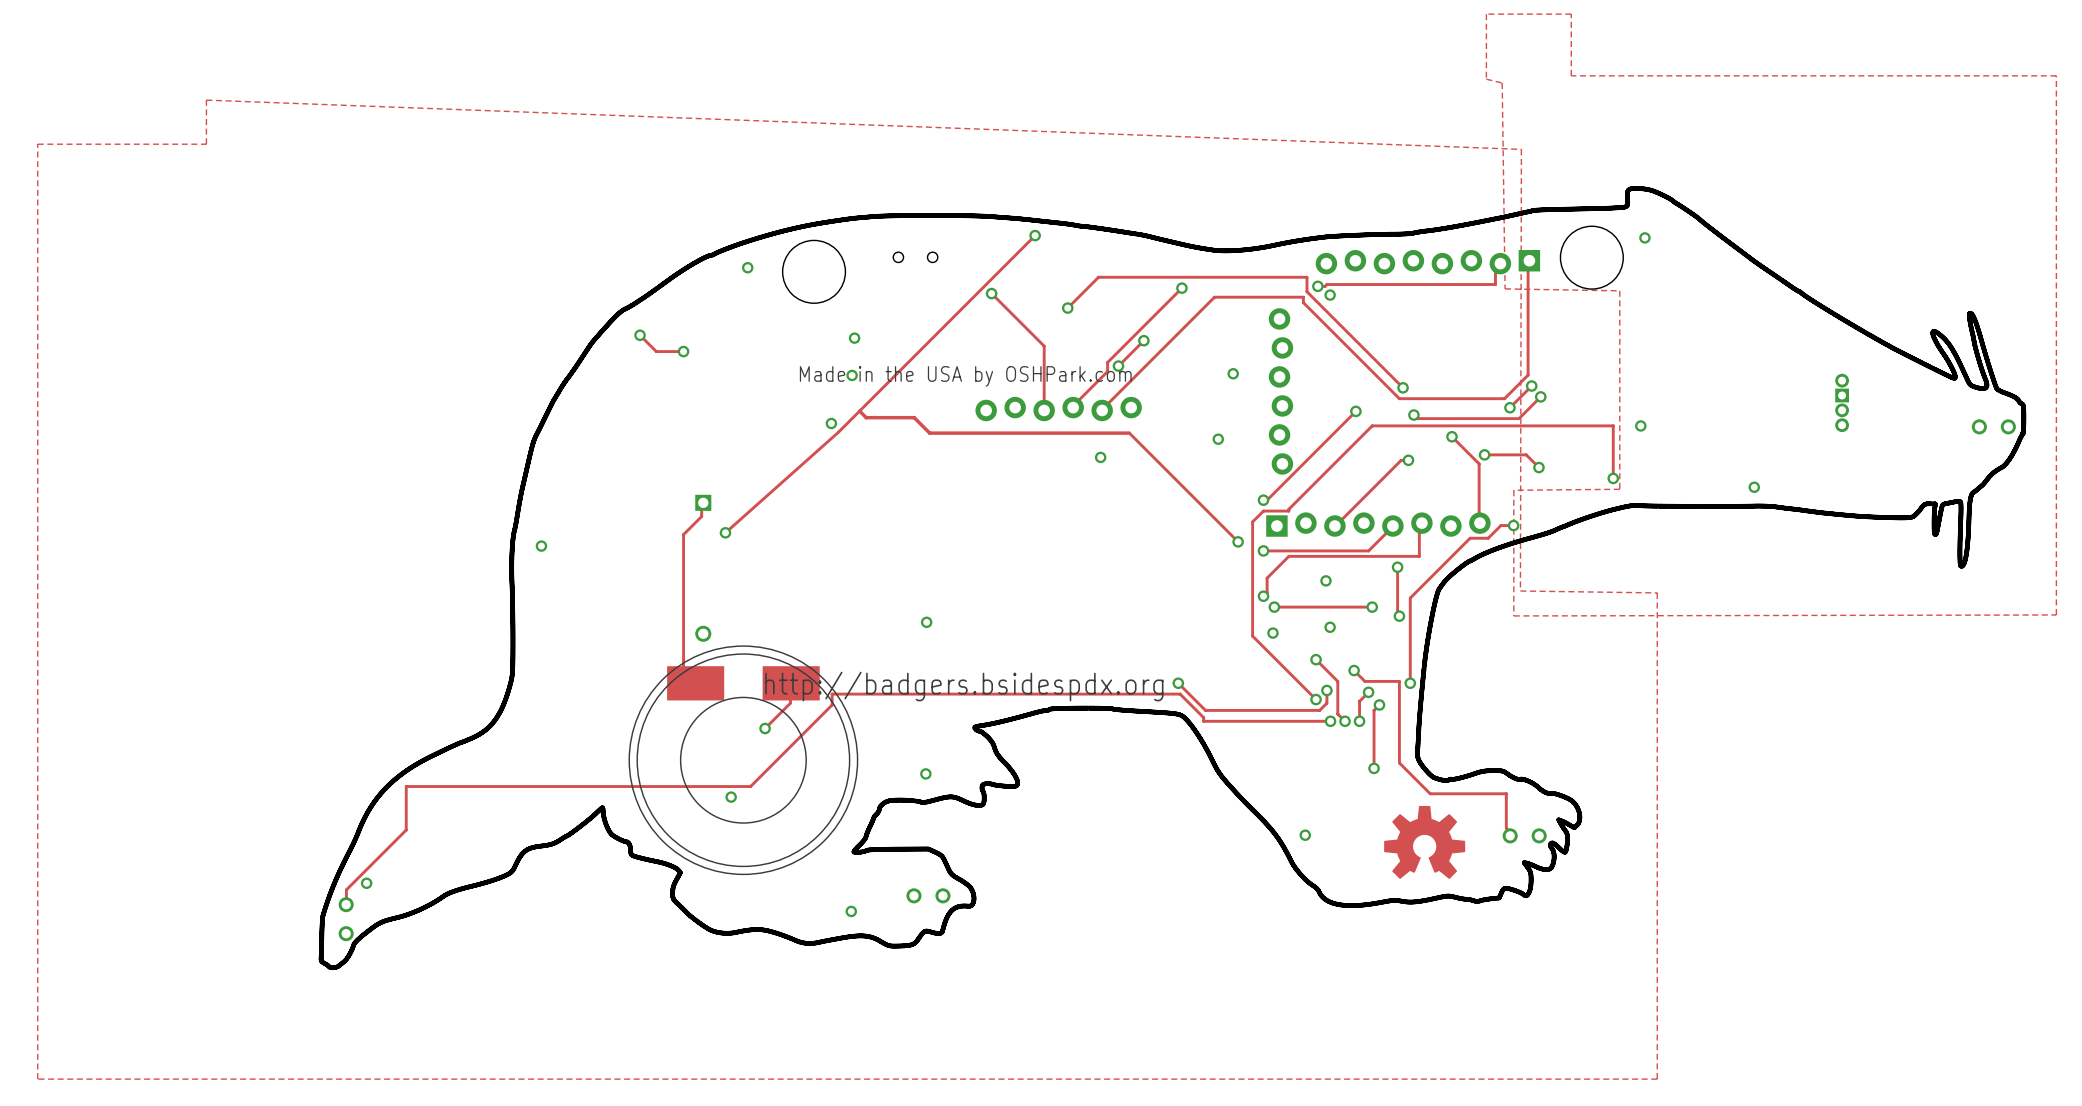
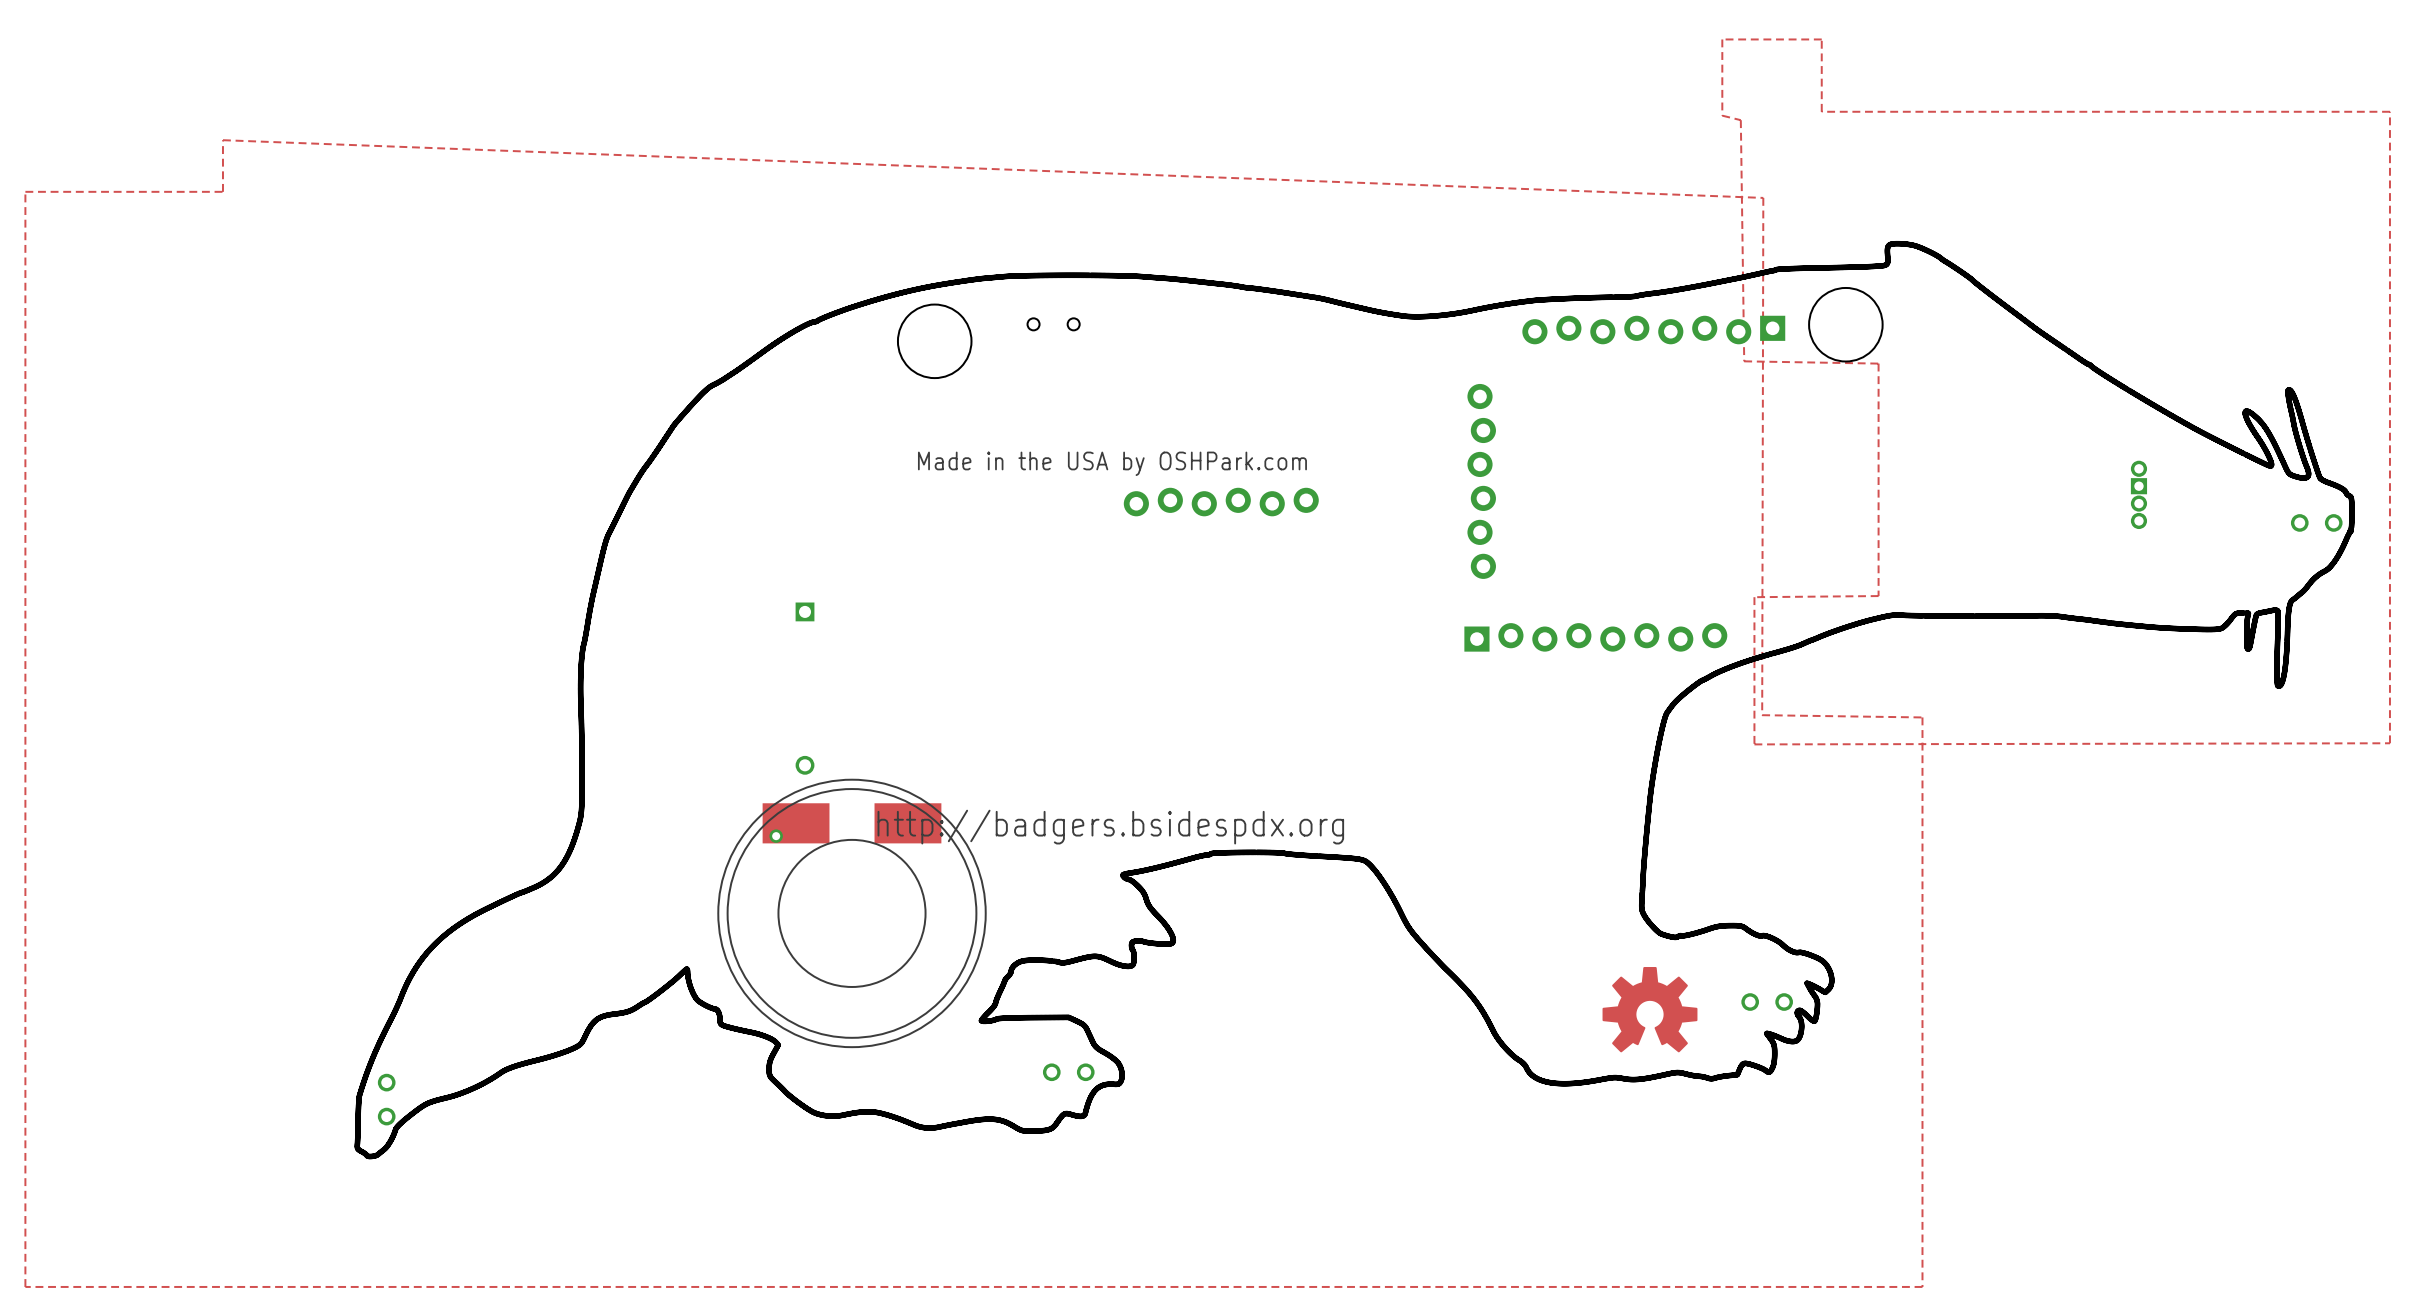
track: (1035, 235) (838, 432) (725, 532) -> none
via: (1035, 235) -> none
via: (1644, 237) -> none
track: (1529, 260) (1528, 375) (1504, 398) (1399, 398) (1303, 302) (1303, 297) (1214, 297) (1102, 410) -> none
track: (1500, 263) (1499, 270) (1495, 273) (1495, 284) (1326, 284) (1317, 286) -> none
via: (747, 267) -> none
via: (1317, 286) -> none
track: (1181, 288) (1107, 362) (1107, 371) (1073, 407) -> none
via: (1181, 288) -> none
track: (991, 293) (1044, 346) (1044, 410) -> none
via: (991, 293) -> none
via: (1330, 295) -> none
track: (1067, 308) (1098, 277) (1306, 277) (1306, 291) (1403, 387) -> none
via: (1067, 308) -> none
track: (640, 335) (656, 351) (683, 351) -> none
via: (640, 335) -> none
via: (854, 338) -> none
track: (1143, 340) (1118, 366) -> none
via: (1143, 340) -> none
via: (683, 351) -> none
via: (1118, 366) -> none
via: (1233, 373) -> none
via: (852, 375) -> none
track: (1531, 386) (1509, 407) -> none
via: (1531, 386) -> none
via: (1403, 387) -> none
track: (1540, 396) (1519, 418) (1413, 418) (1413, 415) -> none
via: (1540, 396) -> none
via: (1509, 407) -> none
track: (859, 411) (866, 417) (914, 417) (929, 433) (1129, 433) (1238, 541) -> none
track: (1355, 411) (1267, 500) (1263, 500) -> none
via: (1355, 411) -> none
via: (1413, 415) -> none
via: (831, 423) -> none
via: (1640, 425) -> none
track: (1451, 436) (1479, 463) (1479, 523) -> none
via: (1451, 436) -> none
via: (1218, 439) -> none
track: (1484, 454) (1526, 454) (1538, 467) -> none
via: (1484, 454) -> none
via: (1100, 457) -> none
track: (1408, 460) (1401, 460) (1334, 526) -> none
via: (1408, 460) -> none
via: (1538, 467) -> none
track: (1613, 478) (1613, 425) (1372, 425) (1288, 511) (1263, 511) (1252, 521) (1252, 636) (1316, 699) -> none
via: (1613, 478) -> none
via: (1754, 487) -> none
via: (1263, 500) -> none
track: (703, 502) (701, 503) (701, 516) (683, 534) (683, 672) (695, 683) -> none
track: (1421, 523) (1419, 525) (1419, 556) (1288, 556) (1267, 578) (1267, 592) (1263, 596) -> none
track: (1513, 525) (1500, 525) (1488, 538) (1470, 538) (1410, 598) (1410, 683) -> none
via: (1513, 525) -> none
track: (1392, 526) (1368, 550) (1263, 550) -> none
via: (725, 532) -> none
via: (1238, 541) -> none
via: (541, 546) -> none
via: (1263, 550) -> none
track: (1397, 567) (1397, 614) (1399, 616) -> none
via: (1397, 567) -> none
via: (1325, 580) -> none
via: (1263, 596) -> none
track: (1274, 607) (1372, 607) -> none
via: (1274, 607) -> none
via: (1372, 607) -> none
via: (1399, 616) -> none
via: (926, 622) -> none
via: (1330, 627) -> none
via: (1272, 633) -> none
track: (1316, 659) (1337, 681) (1337, 714) (1345, 721) -> none
via: (1316, 659) -> none
track: (1354, 670) (1364, 681) (1399, 681) (1399, 762) (1430, 793) (1506, 793) (1506, 828) (1511, 833) (1510, 835) -> none
via: (1354, 670) -> none
track: (791, 683) (790, 703) (765, 728) -> none
track: (1178, 683) (1205, 710) (1319, 710) (1326, 703) (1326, 690) -> none
via: (1178, 683) -> none
via: (1410, 683) -> none
via: (1326, 690) -> none
track: (1368, 692) (1359, 701) (1359, 721) -> none
via: (1368, 692) -> none
via: none -> (776, 836)
via: (1316, 699) -> none
track: (1379, 704) (1374, 710) (1374, 768) -> none
via: (1379, 704) -> none
track: (1330, 721) (1203, 721) (1203, 717) (1180, 694) (832, 694) (832, 704) (750, 786) (406, 786) (406, 830) (346, 889) (346, 904) -> none
via: (1330, 721) -> none
via: (1345, 721) -> none
via: (1359, 721) -> none
via: (765, 728) -> none
via: (1374, 768) -> none
via: (925, 773) -> none
via: (731, 797) -> none
via: (1305, 835) -> none
via: (366, 883) -> none
via: (851, 911) -> none

